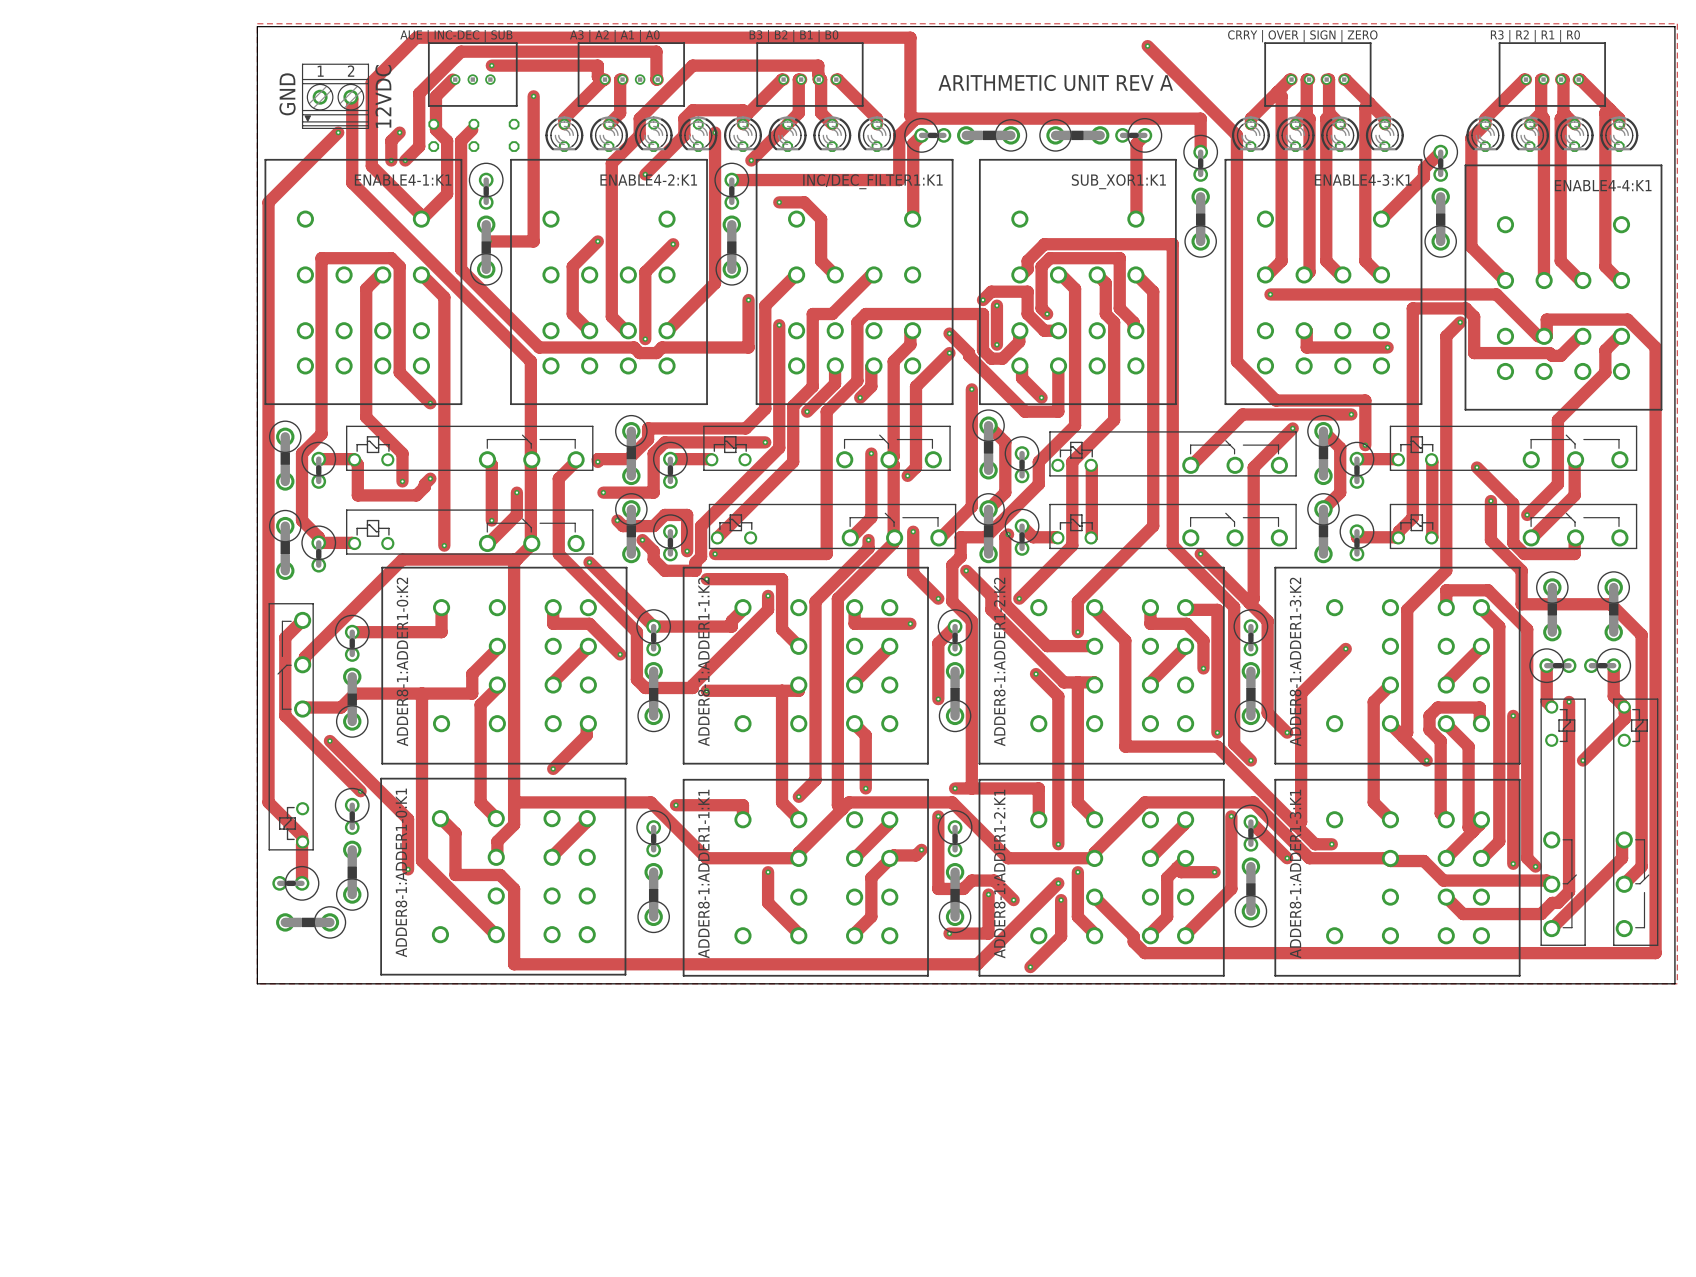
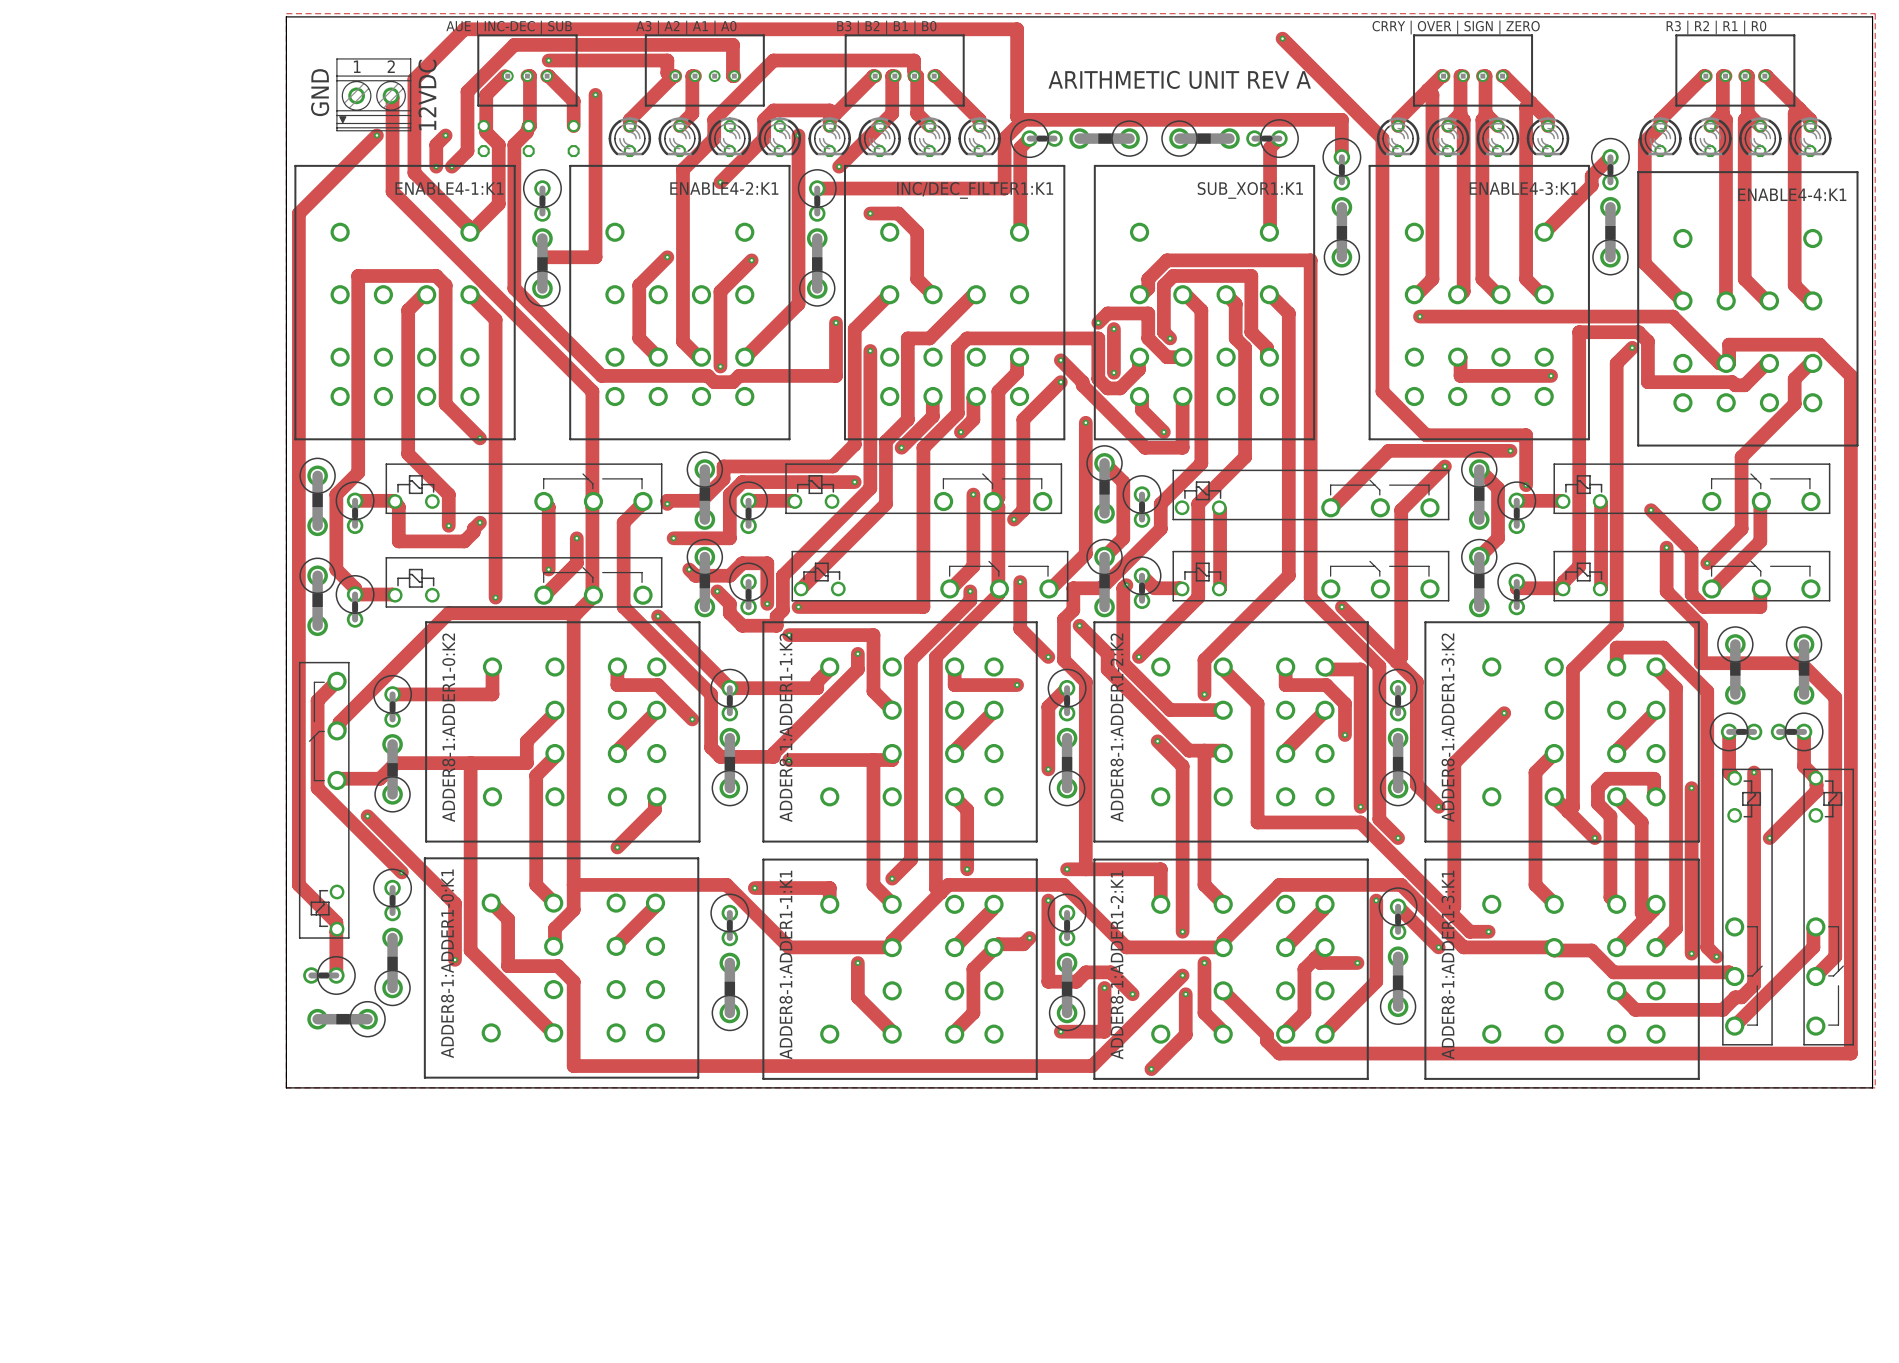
track: none -> (527, 76) (529, 76) (529, 126) (526, 132)
track: none -> (547, 76) (573, 101) (573, 126)

